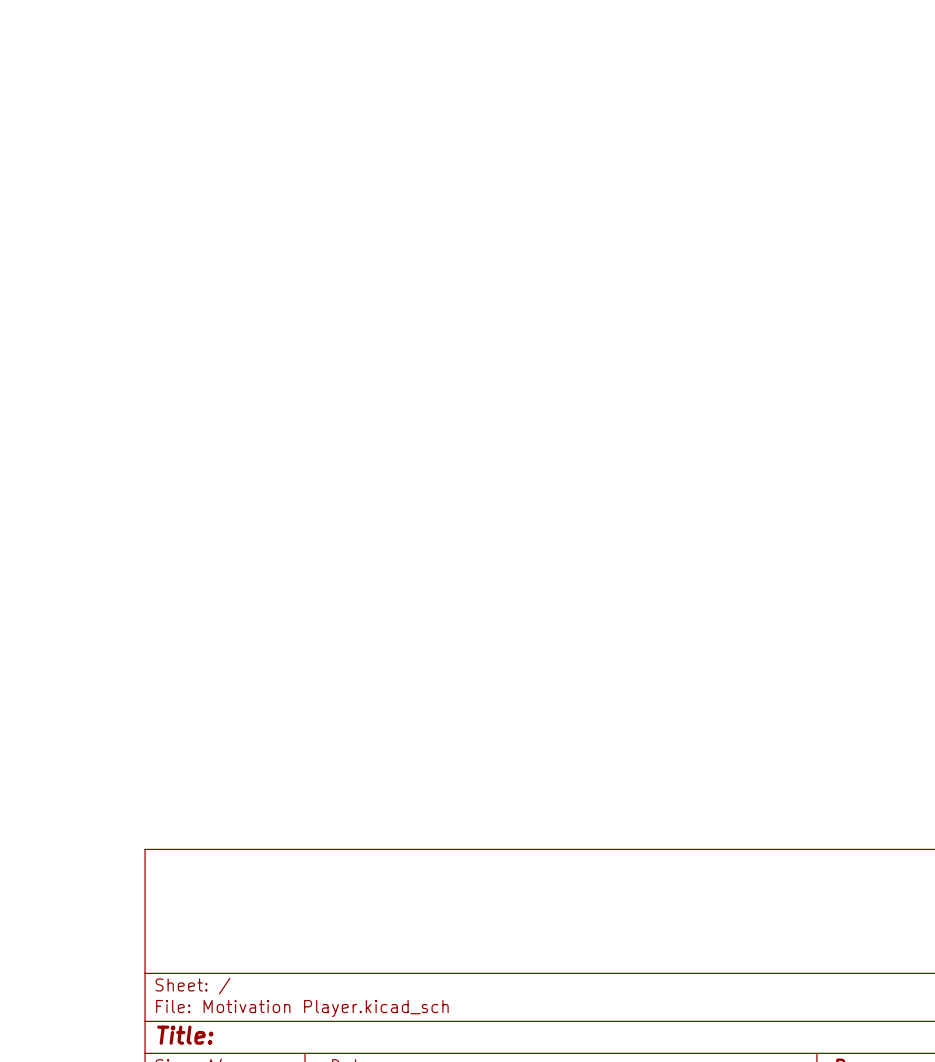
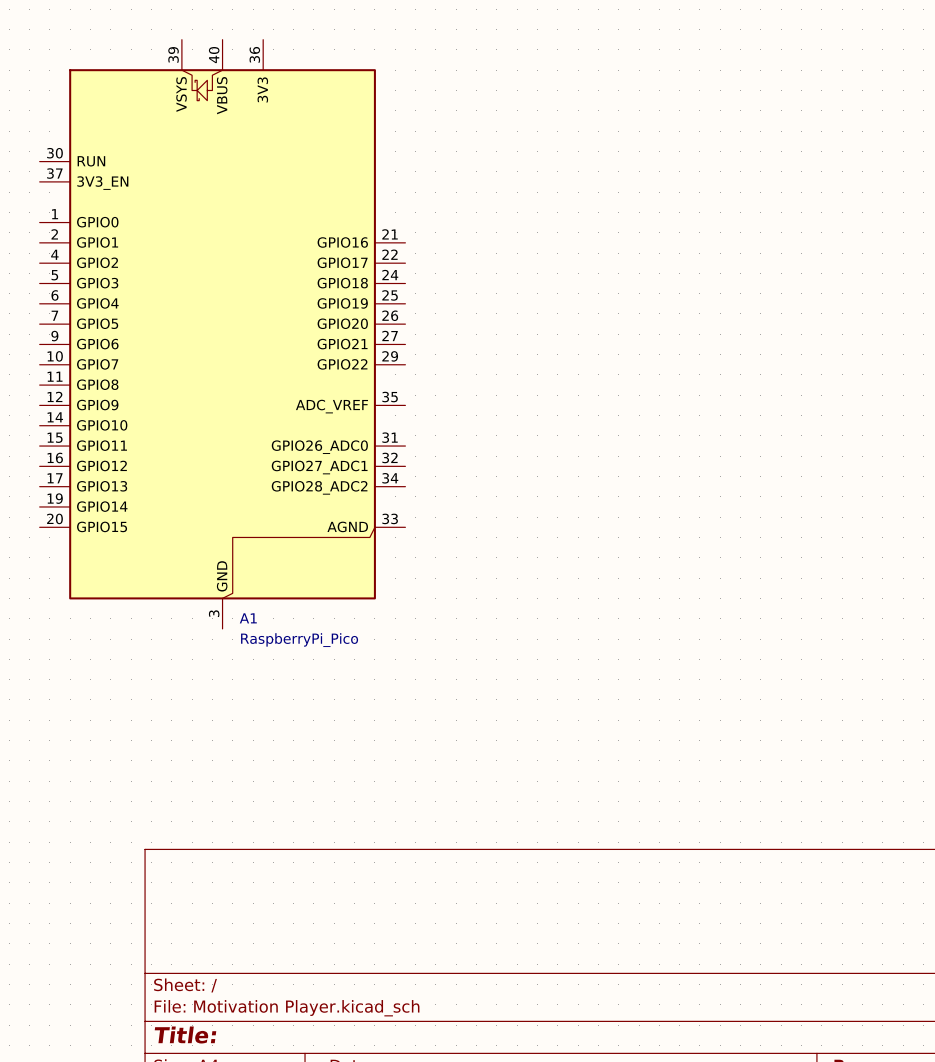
A1: none -> RaspberryPi_Pico (222, 334)

